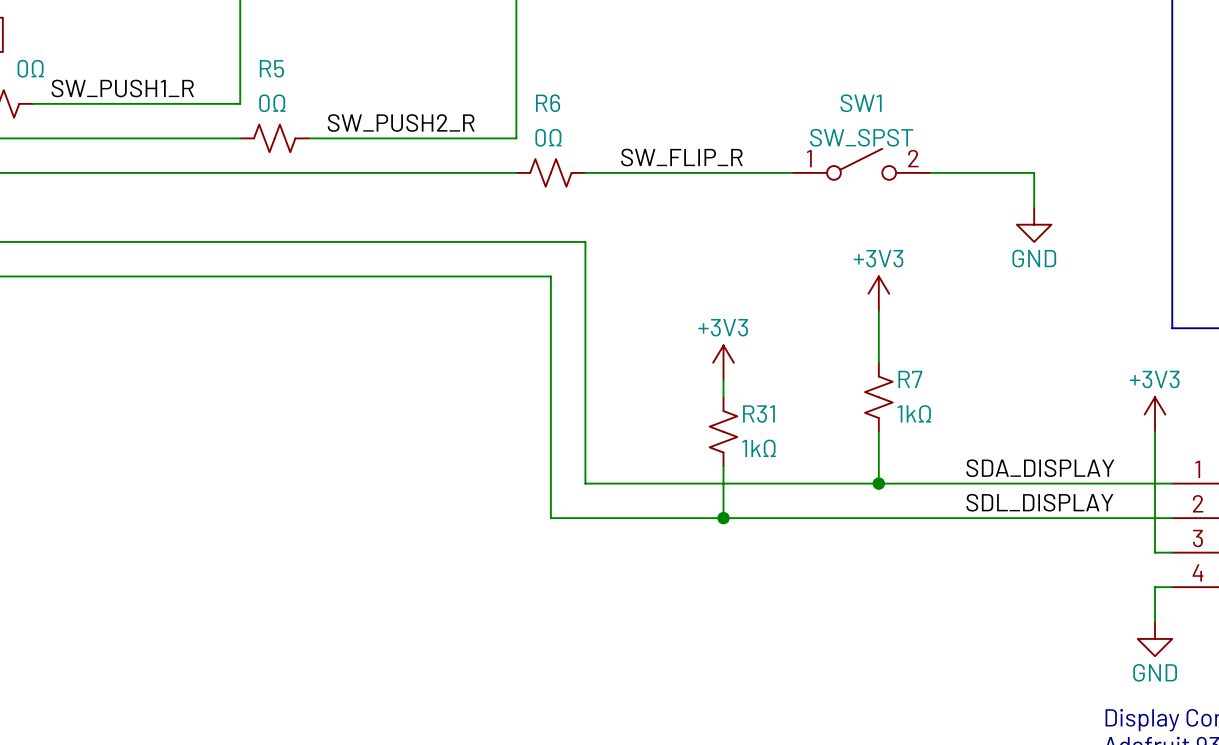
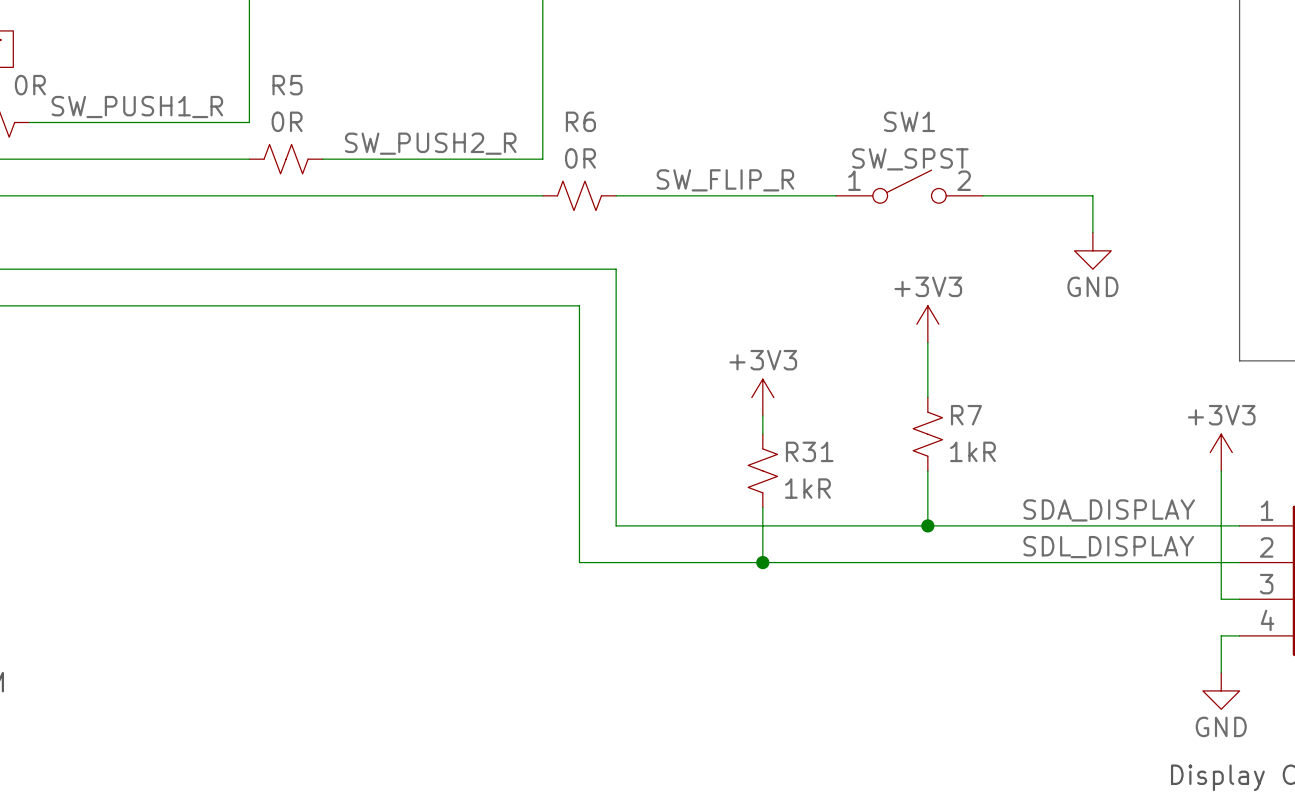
part value: 0Ω (30, 68) -> 0R (30, 85)
R5 value: 0Ω (272, 103) -> 0R (287, 121)
R6 value: 0Ω (548, 137) -> 0R (580, 158)
R7 value: 1kΩ (914, 413) -> 1kR (972, 451)
R31 value: 1kΩ (758, 448) -> 1kR (807, 488)

